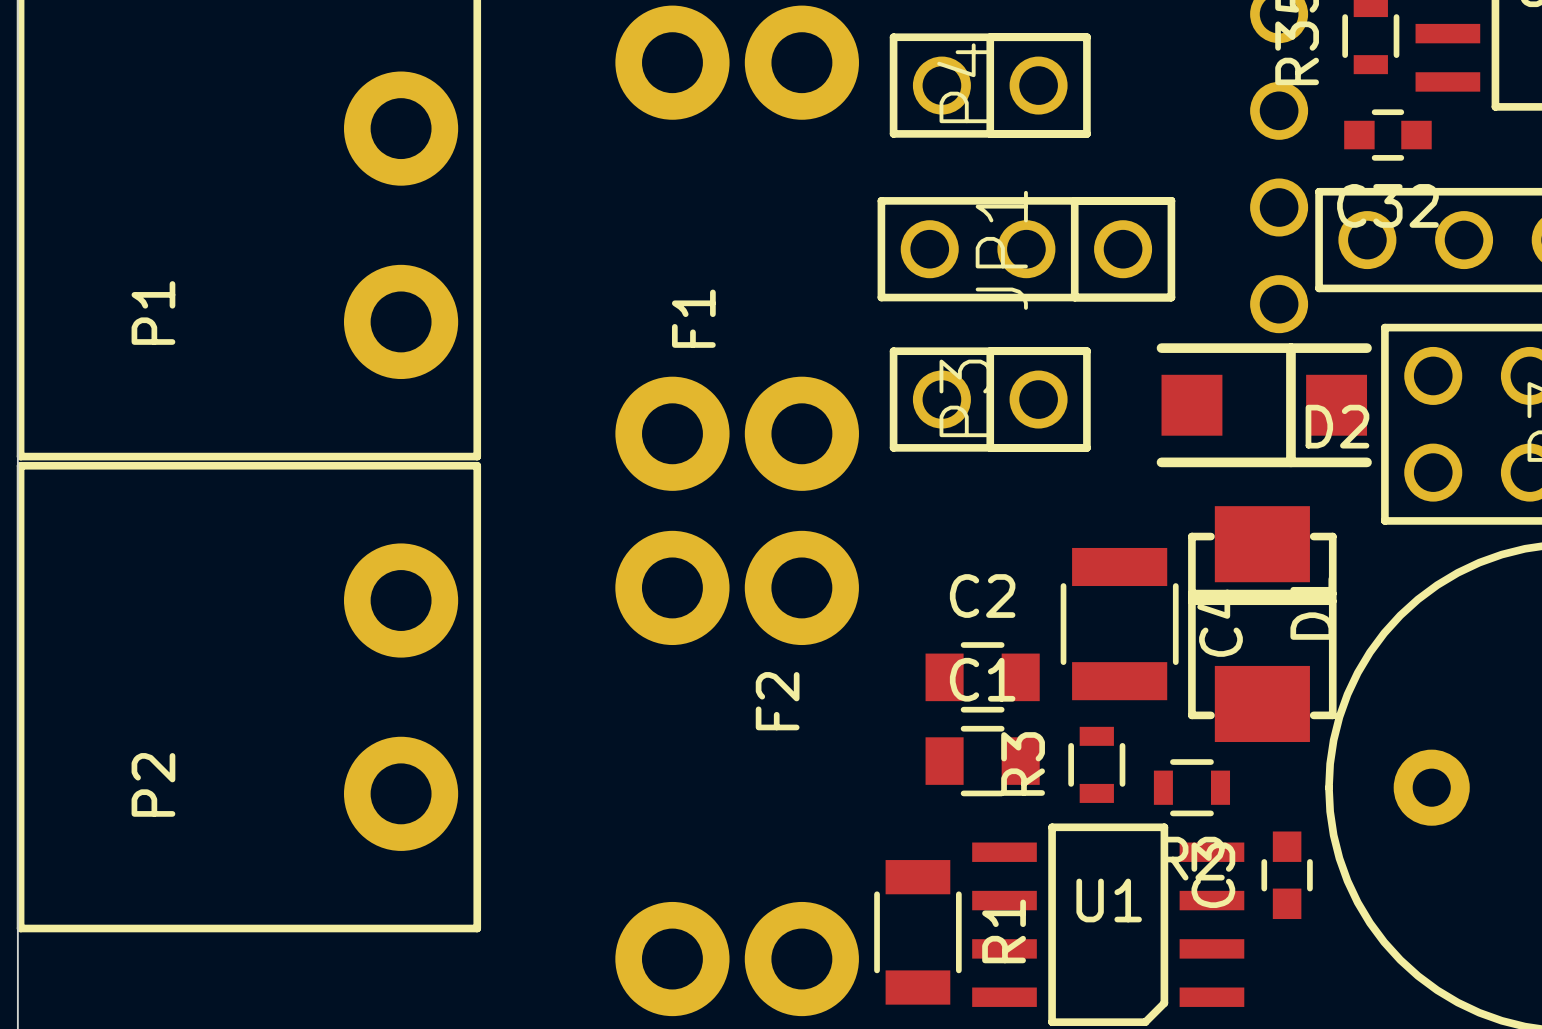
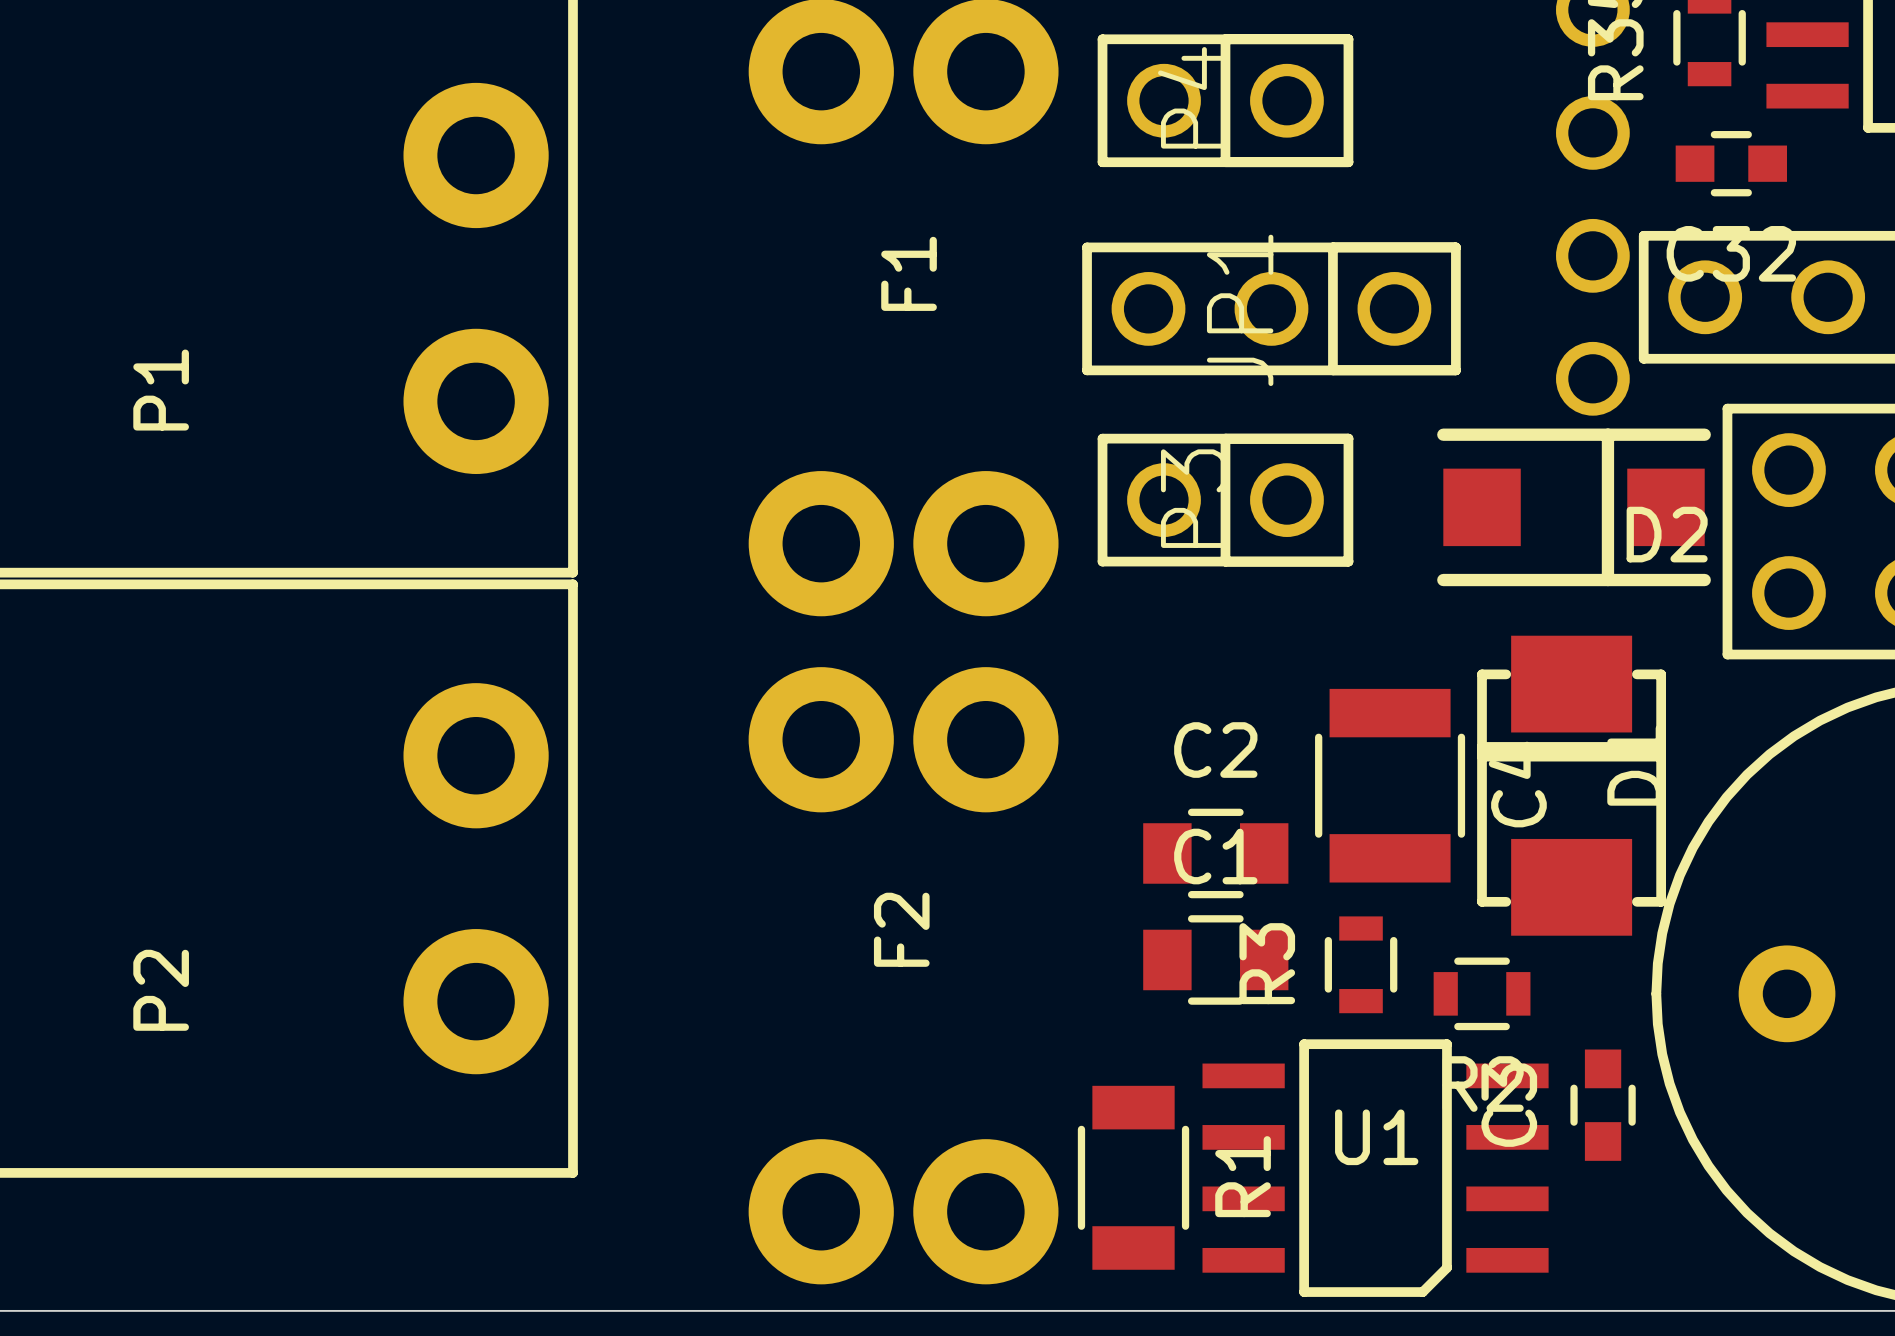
F1 name position: F1 (693, 318) -> F1 (909, 273)
F2 name position: F2 (777, 701) -> F2 (901, 929)

